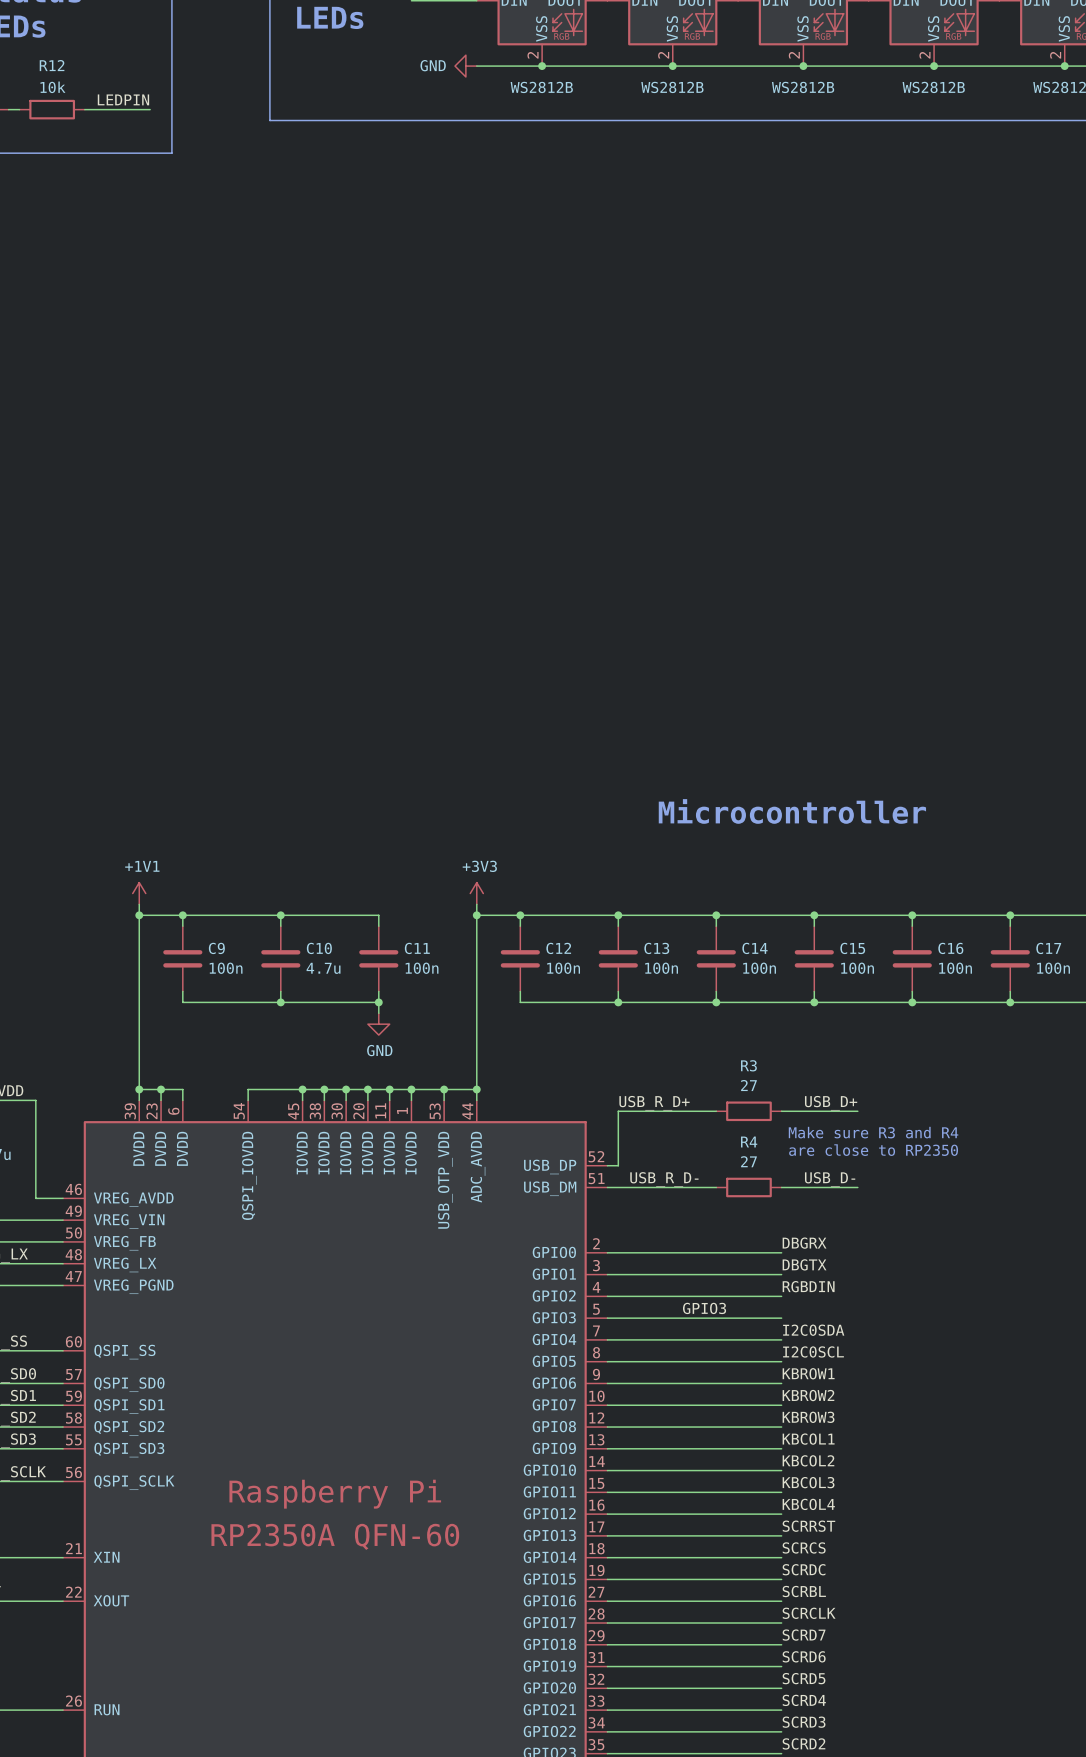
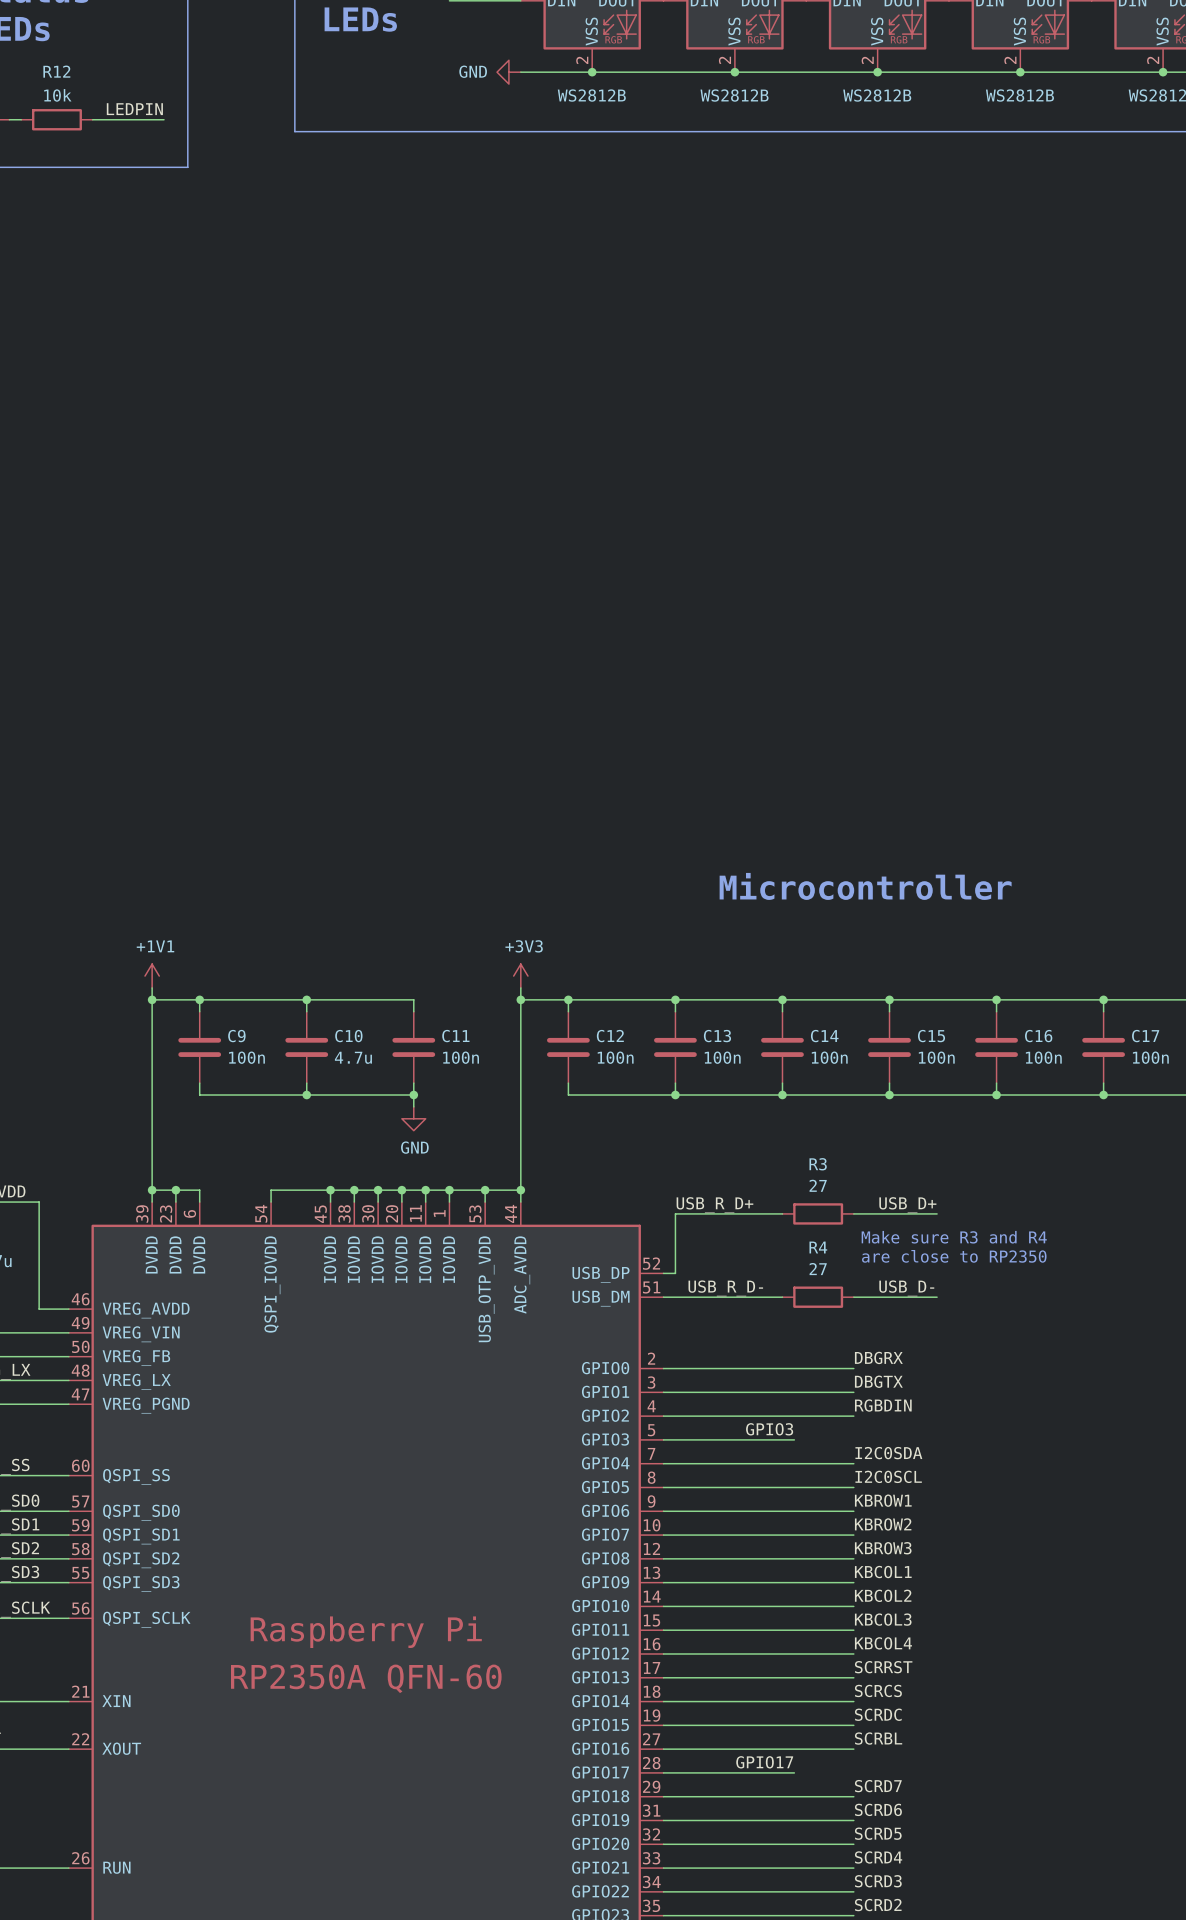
wire: (727, 1318) (781, 1318) -> none
label: none -> GPIO17 (764, 1762)
label: SCRCLK (809, 1613) -> none
wire: (727, 1623) (781, 1623) -> none

